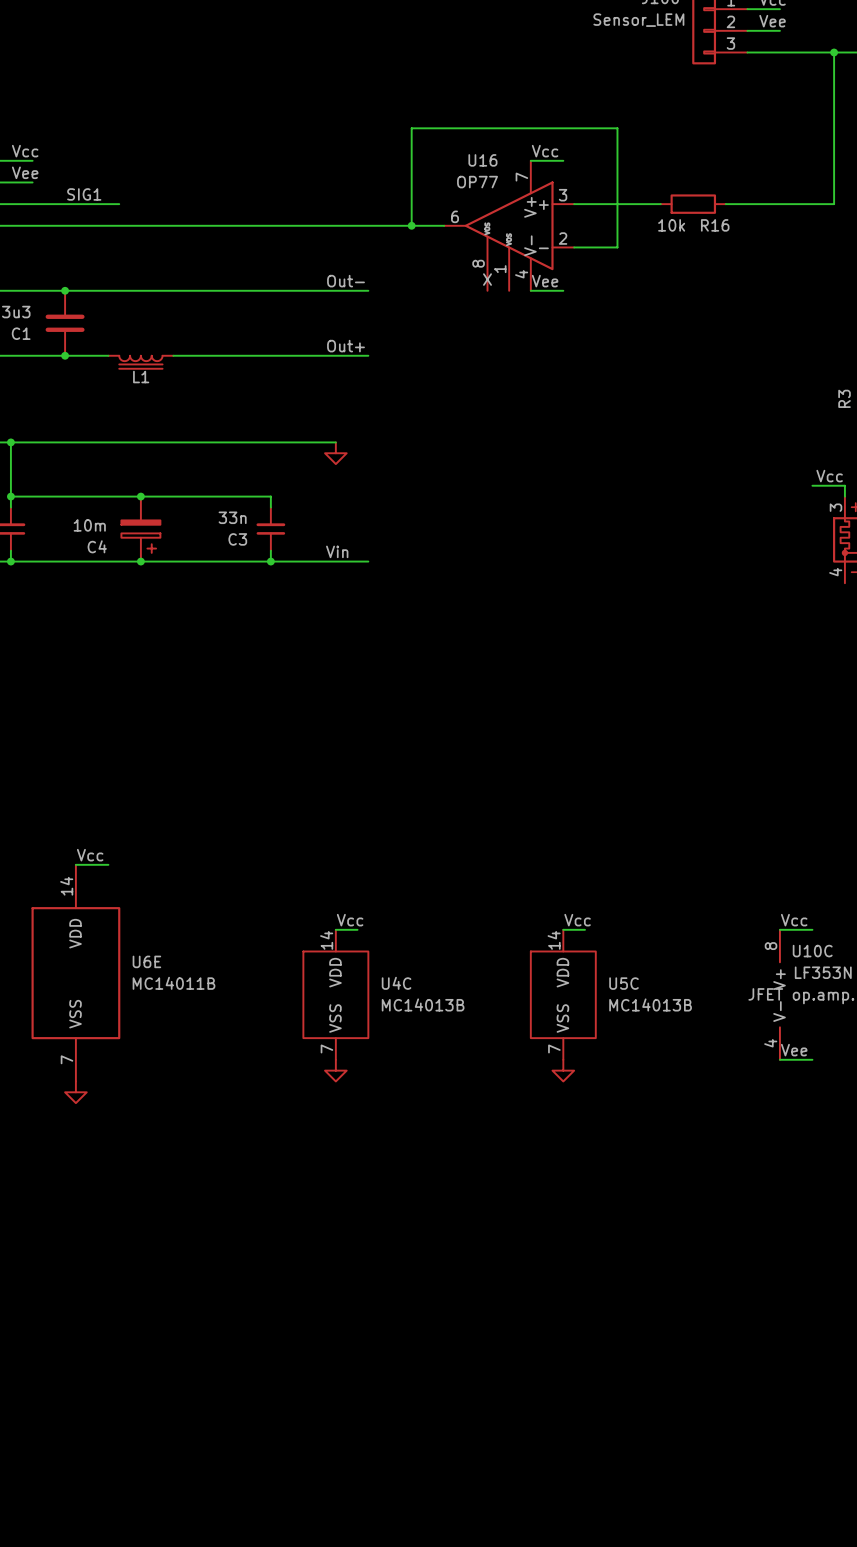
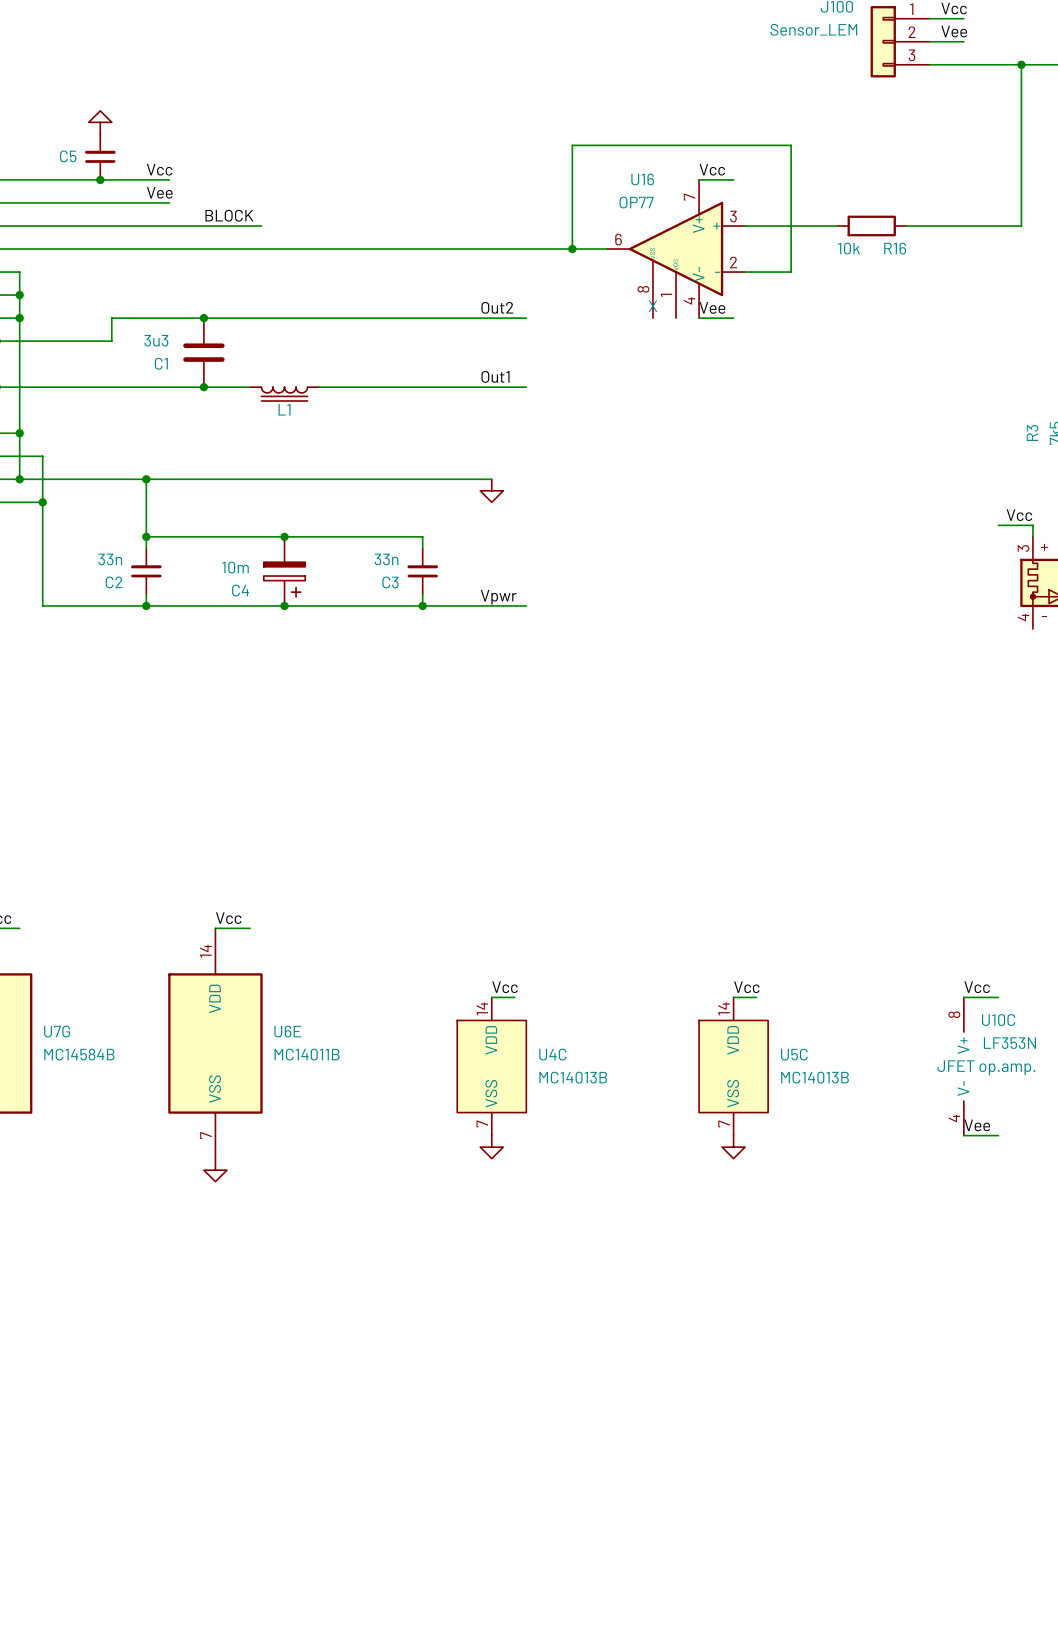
label: SIG1 (84, 194) -> BLOCK (229, 215)
label: Out- (346, 281) -> Out2 (497, 307)
label: Out+ (346, 346) -> Out1 (495, 376)
label: Vin (337, 551) -> Vpwr (498, 597)

